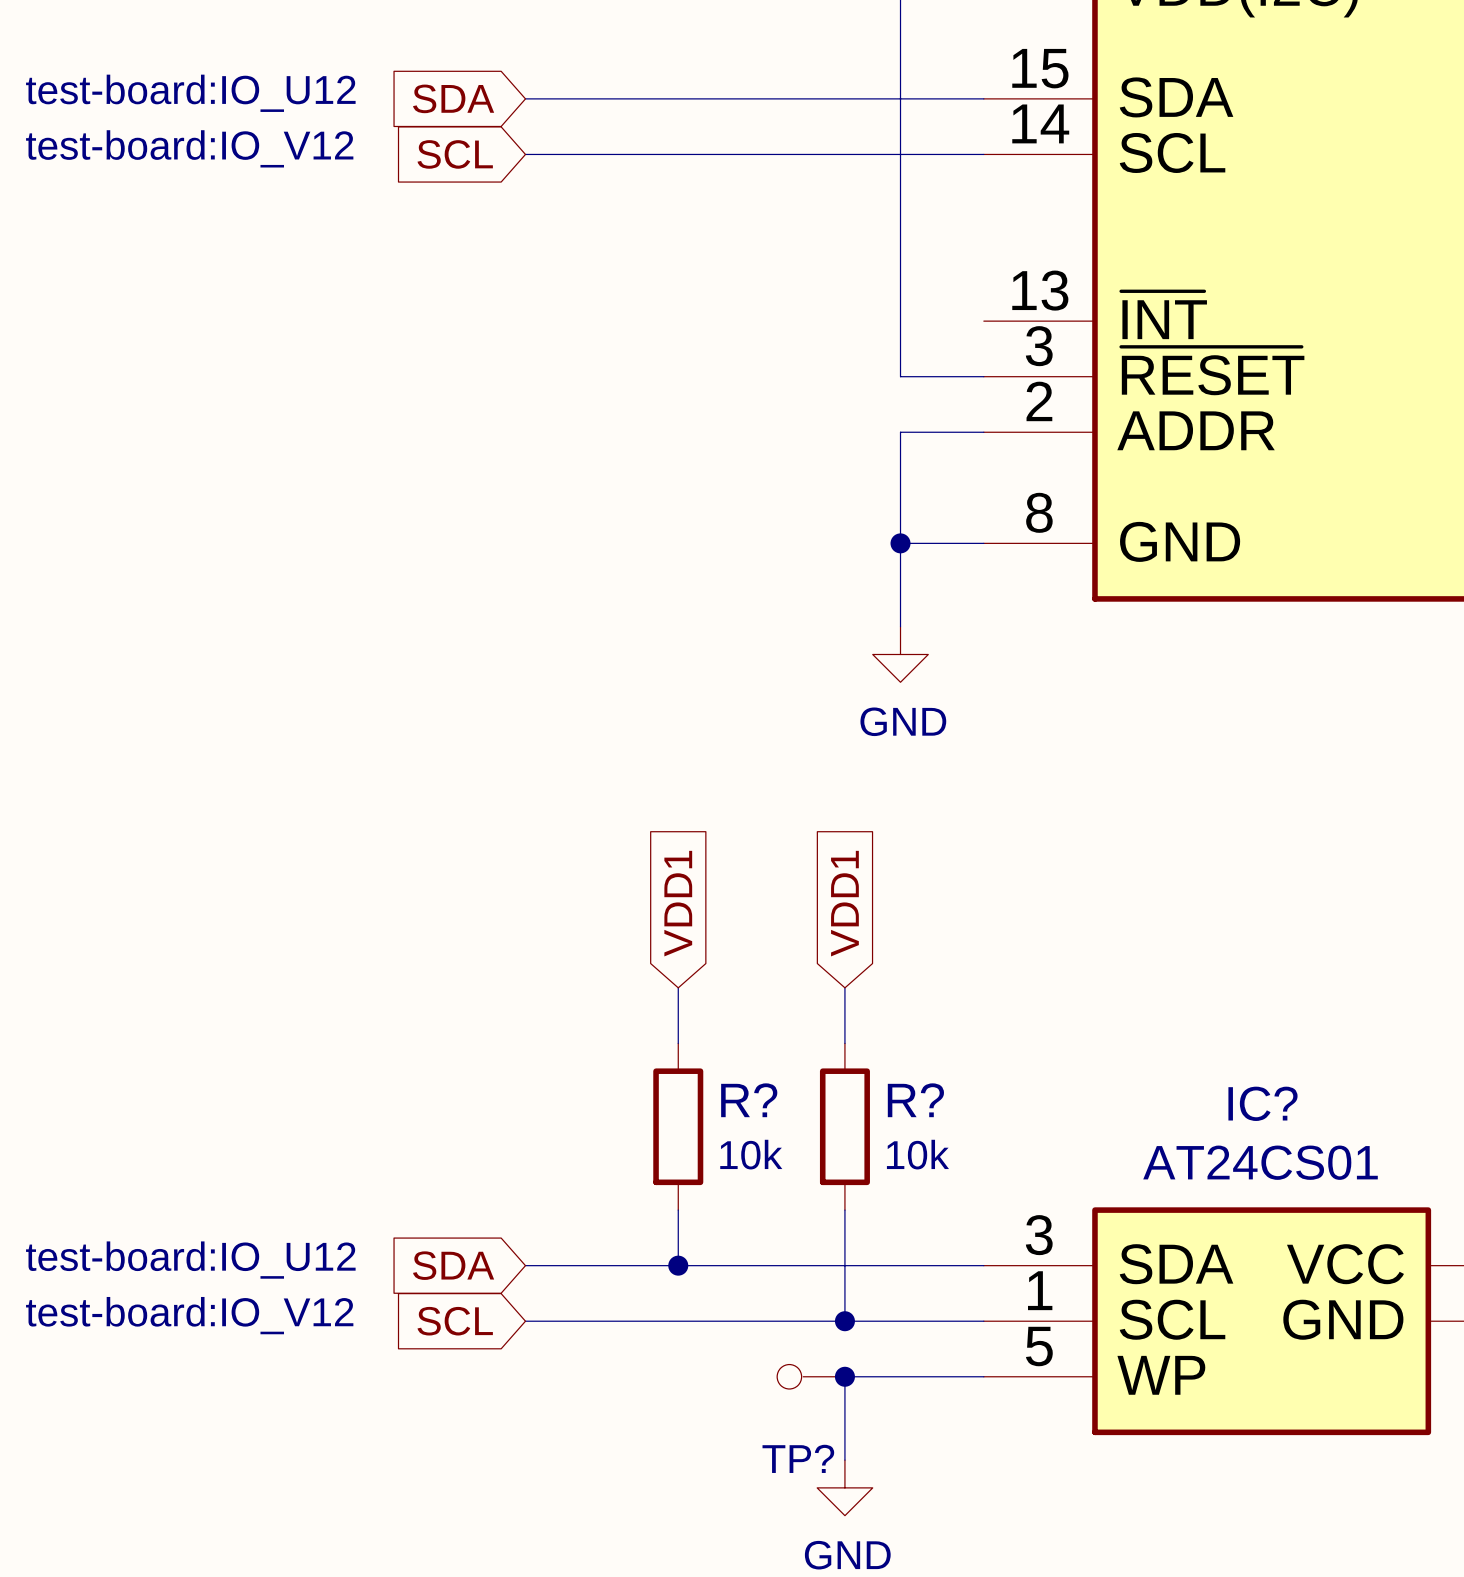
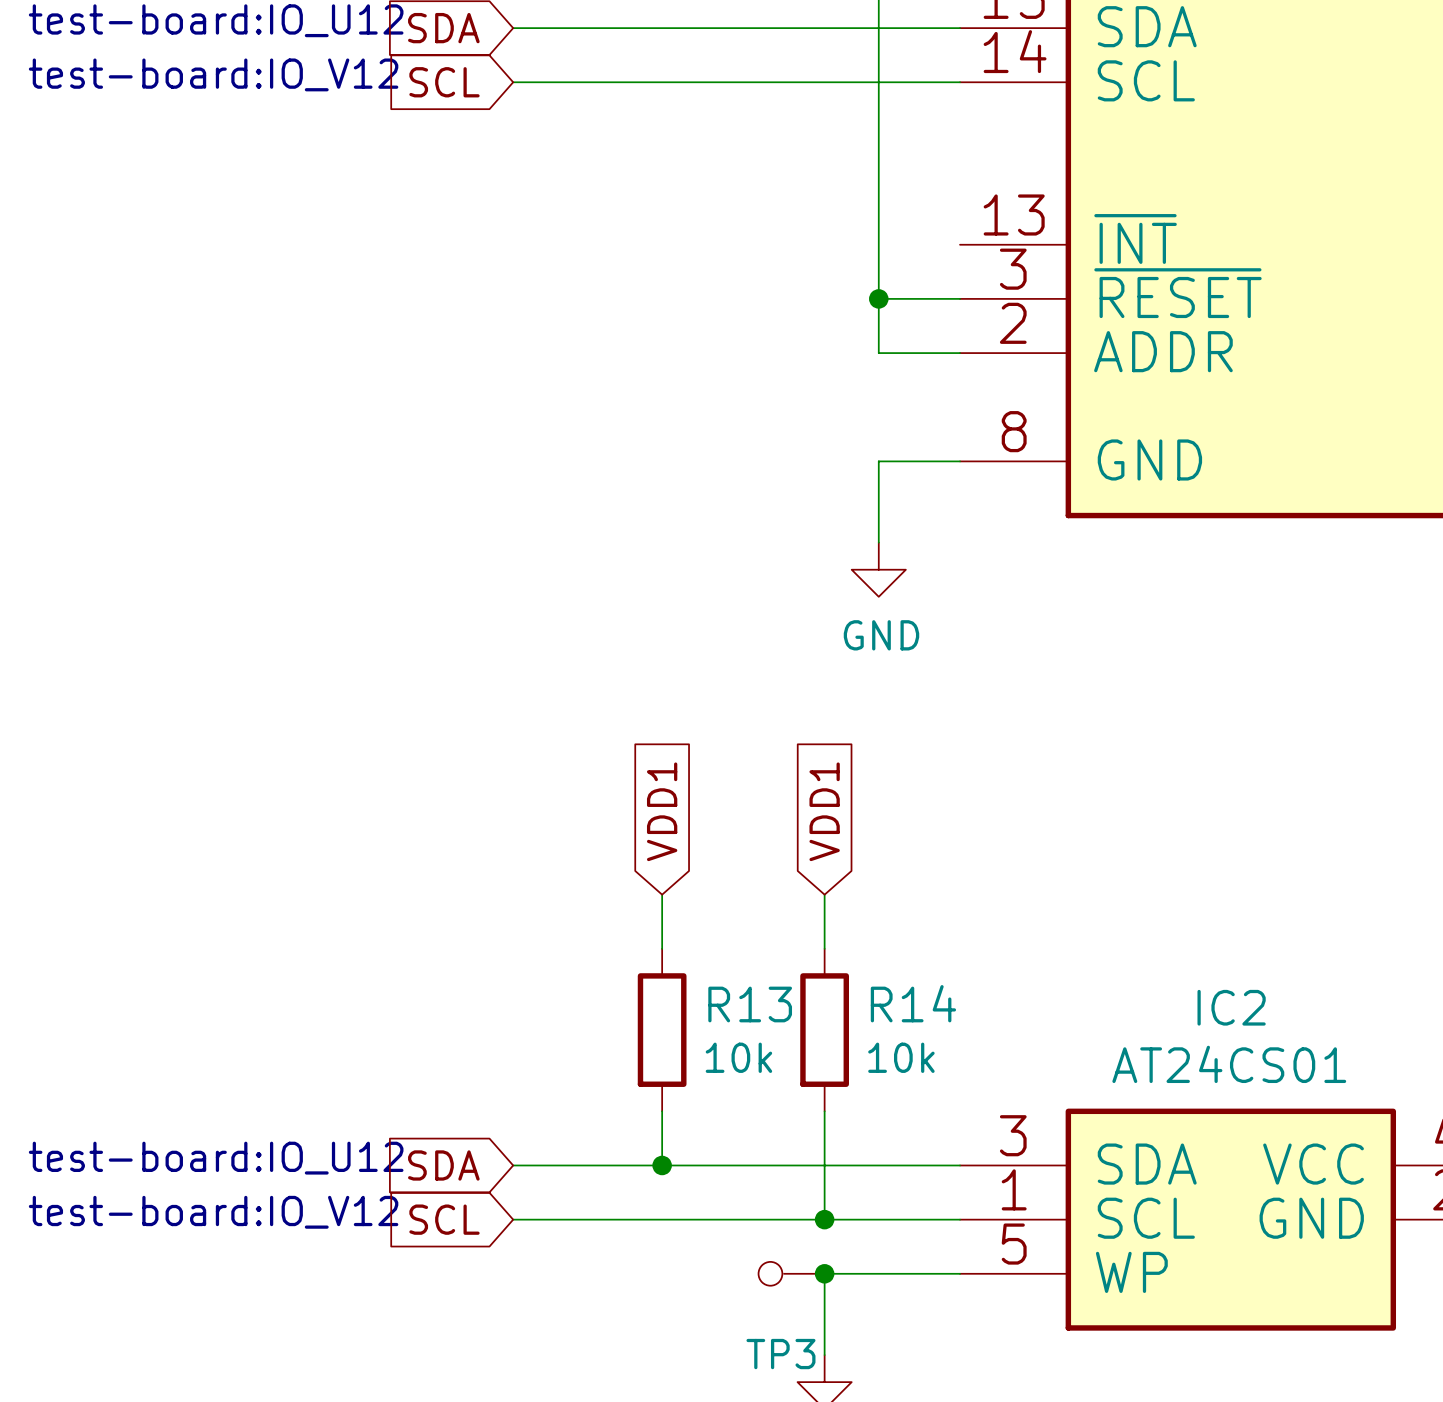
junction: none -> (878, 298)
wire: (900, 432) (900, 543) -> (878, 353) (878, 298)
junction: (900, 543) -> none
R? name: R? (749, 1100) -> R13 (750, 1004)
R? name: R? (915, 1100) -> R14 (913, 1003)
IC? name: IC? (1262, 1103) -> IC2 (1231, 1007)
TP? name: TP? (798, 1458) -> TP3 (780, 1354)

